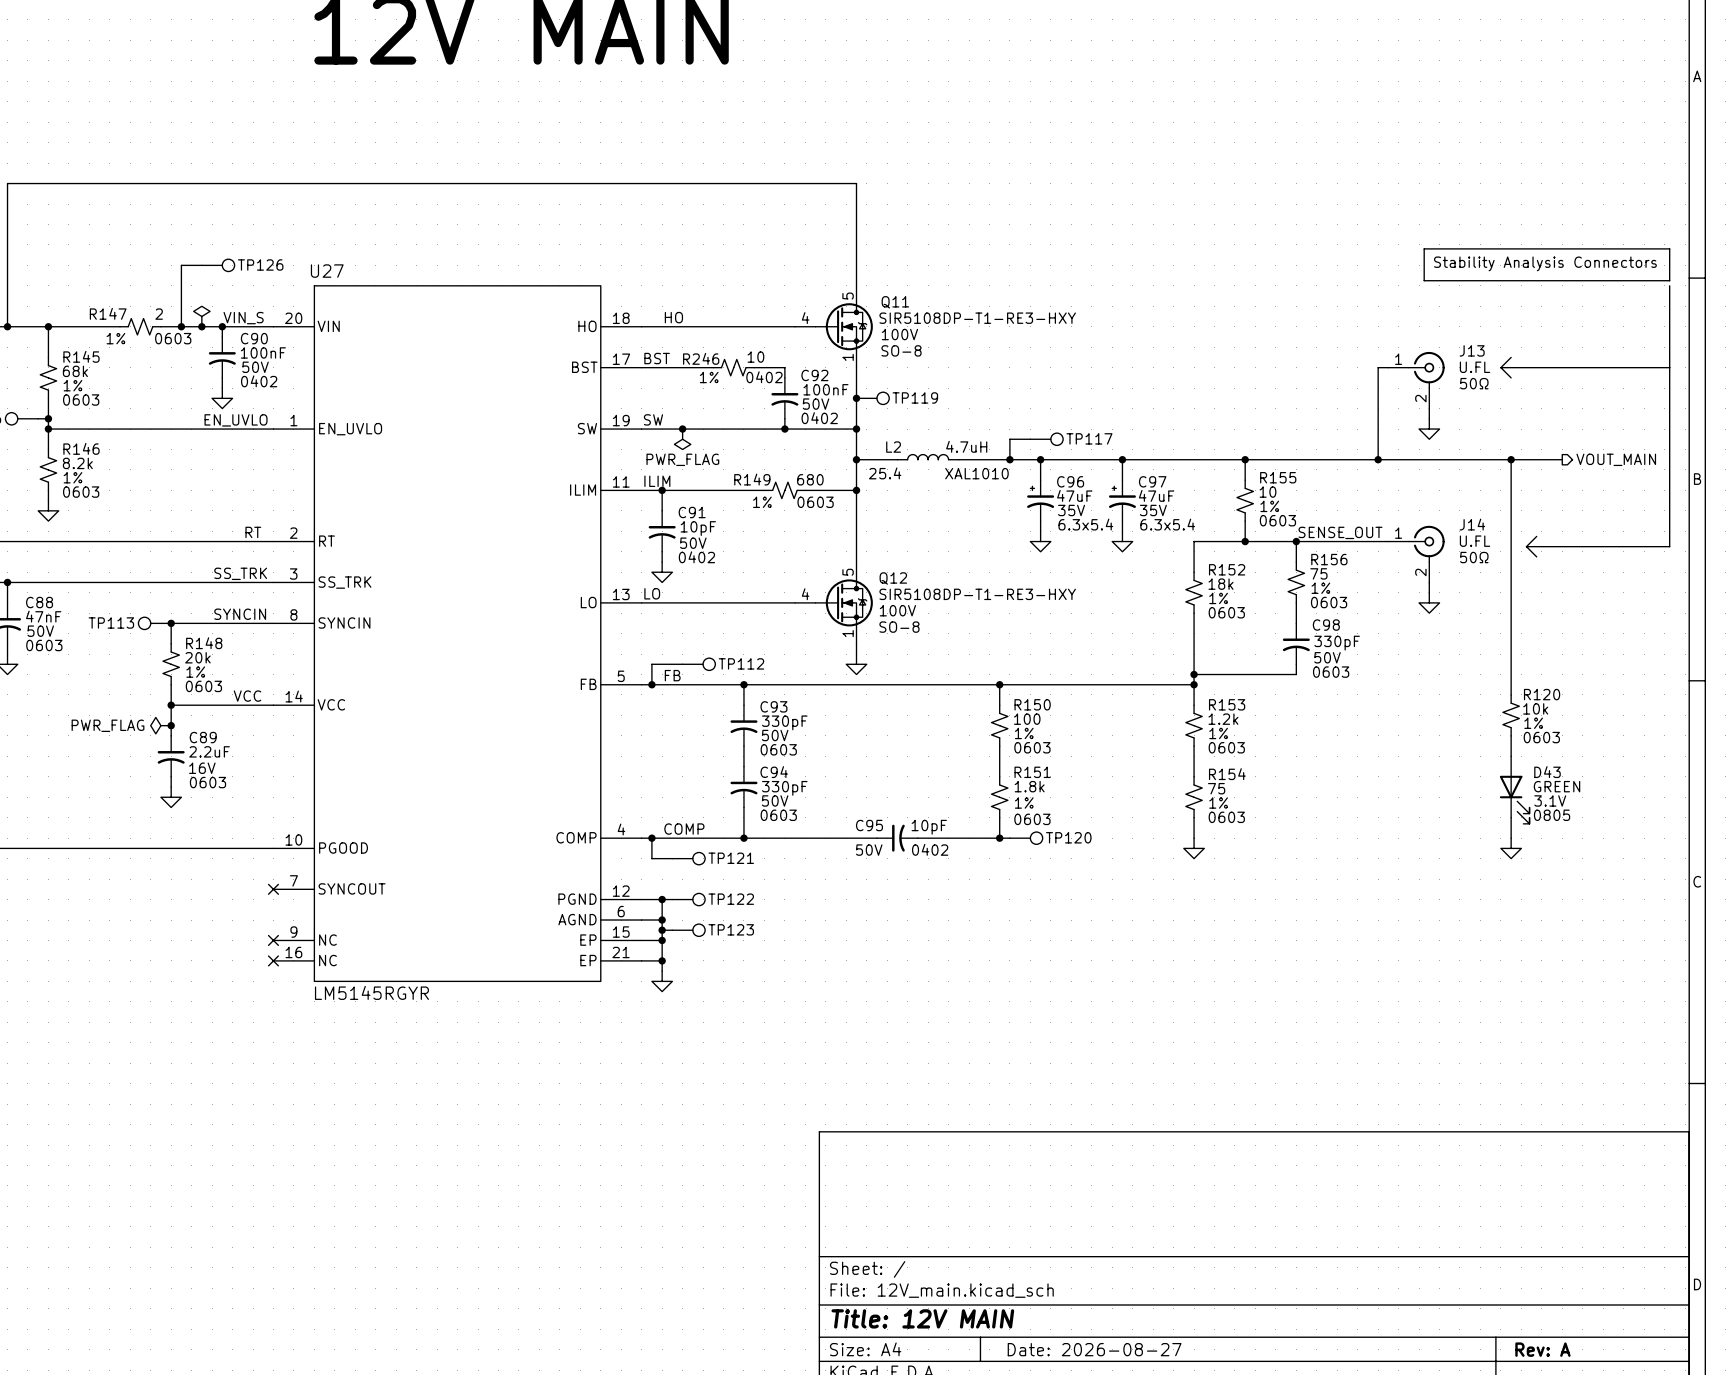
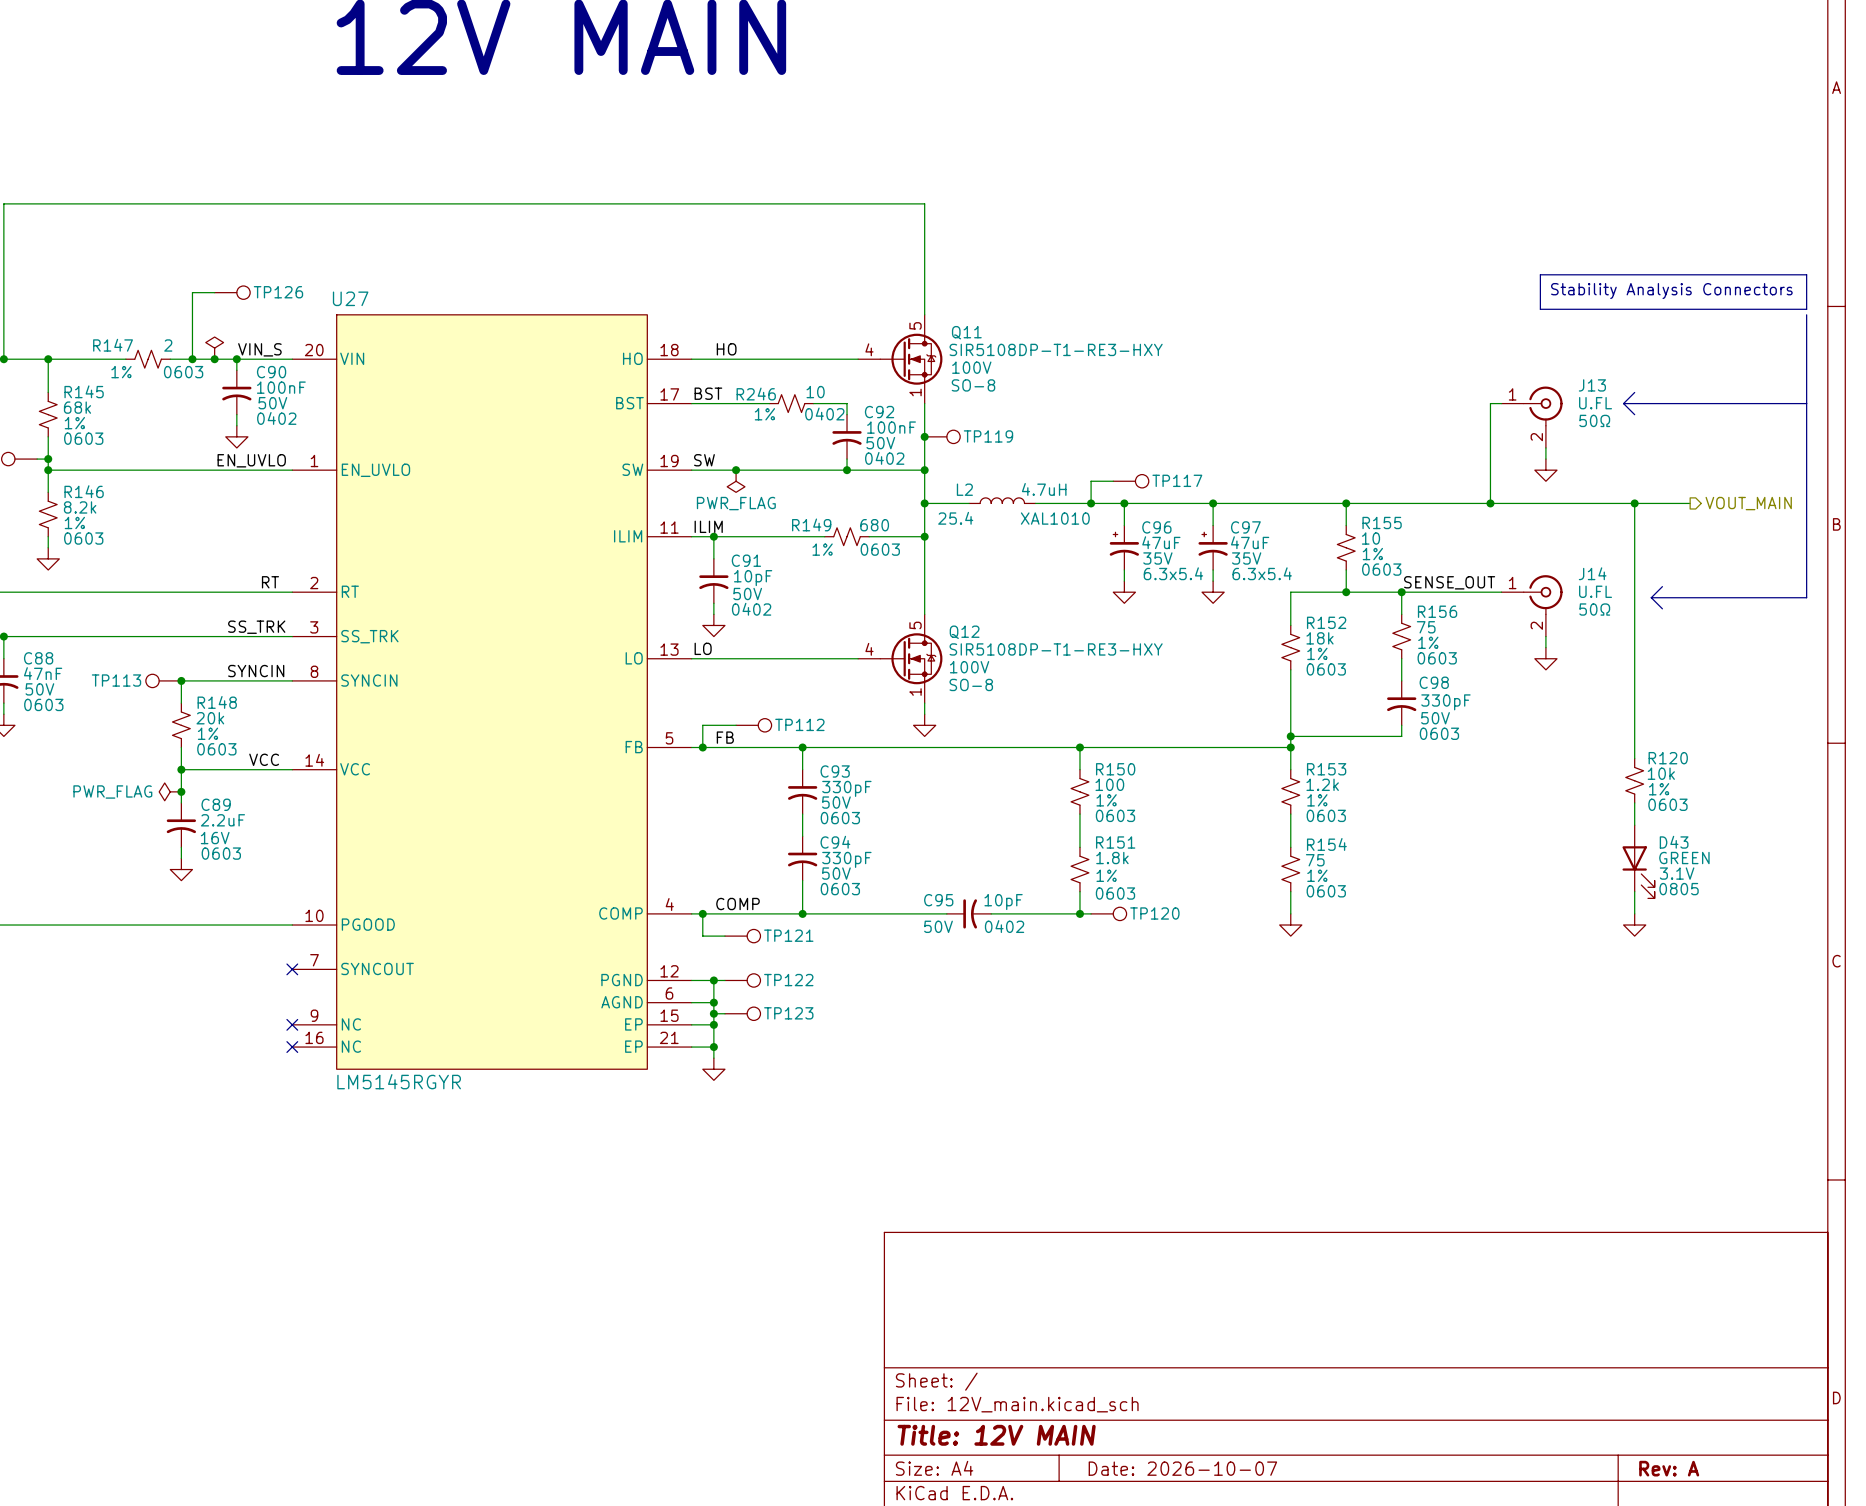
title block: Date: 2026-08-27 (1094, 1349) -> Date: 2026-10-07 (1182, 1468)

